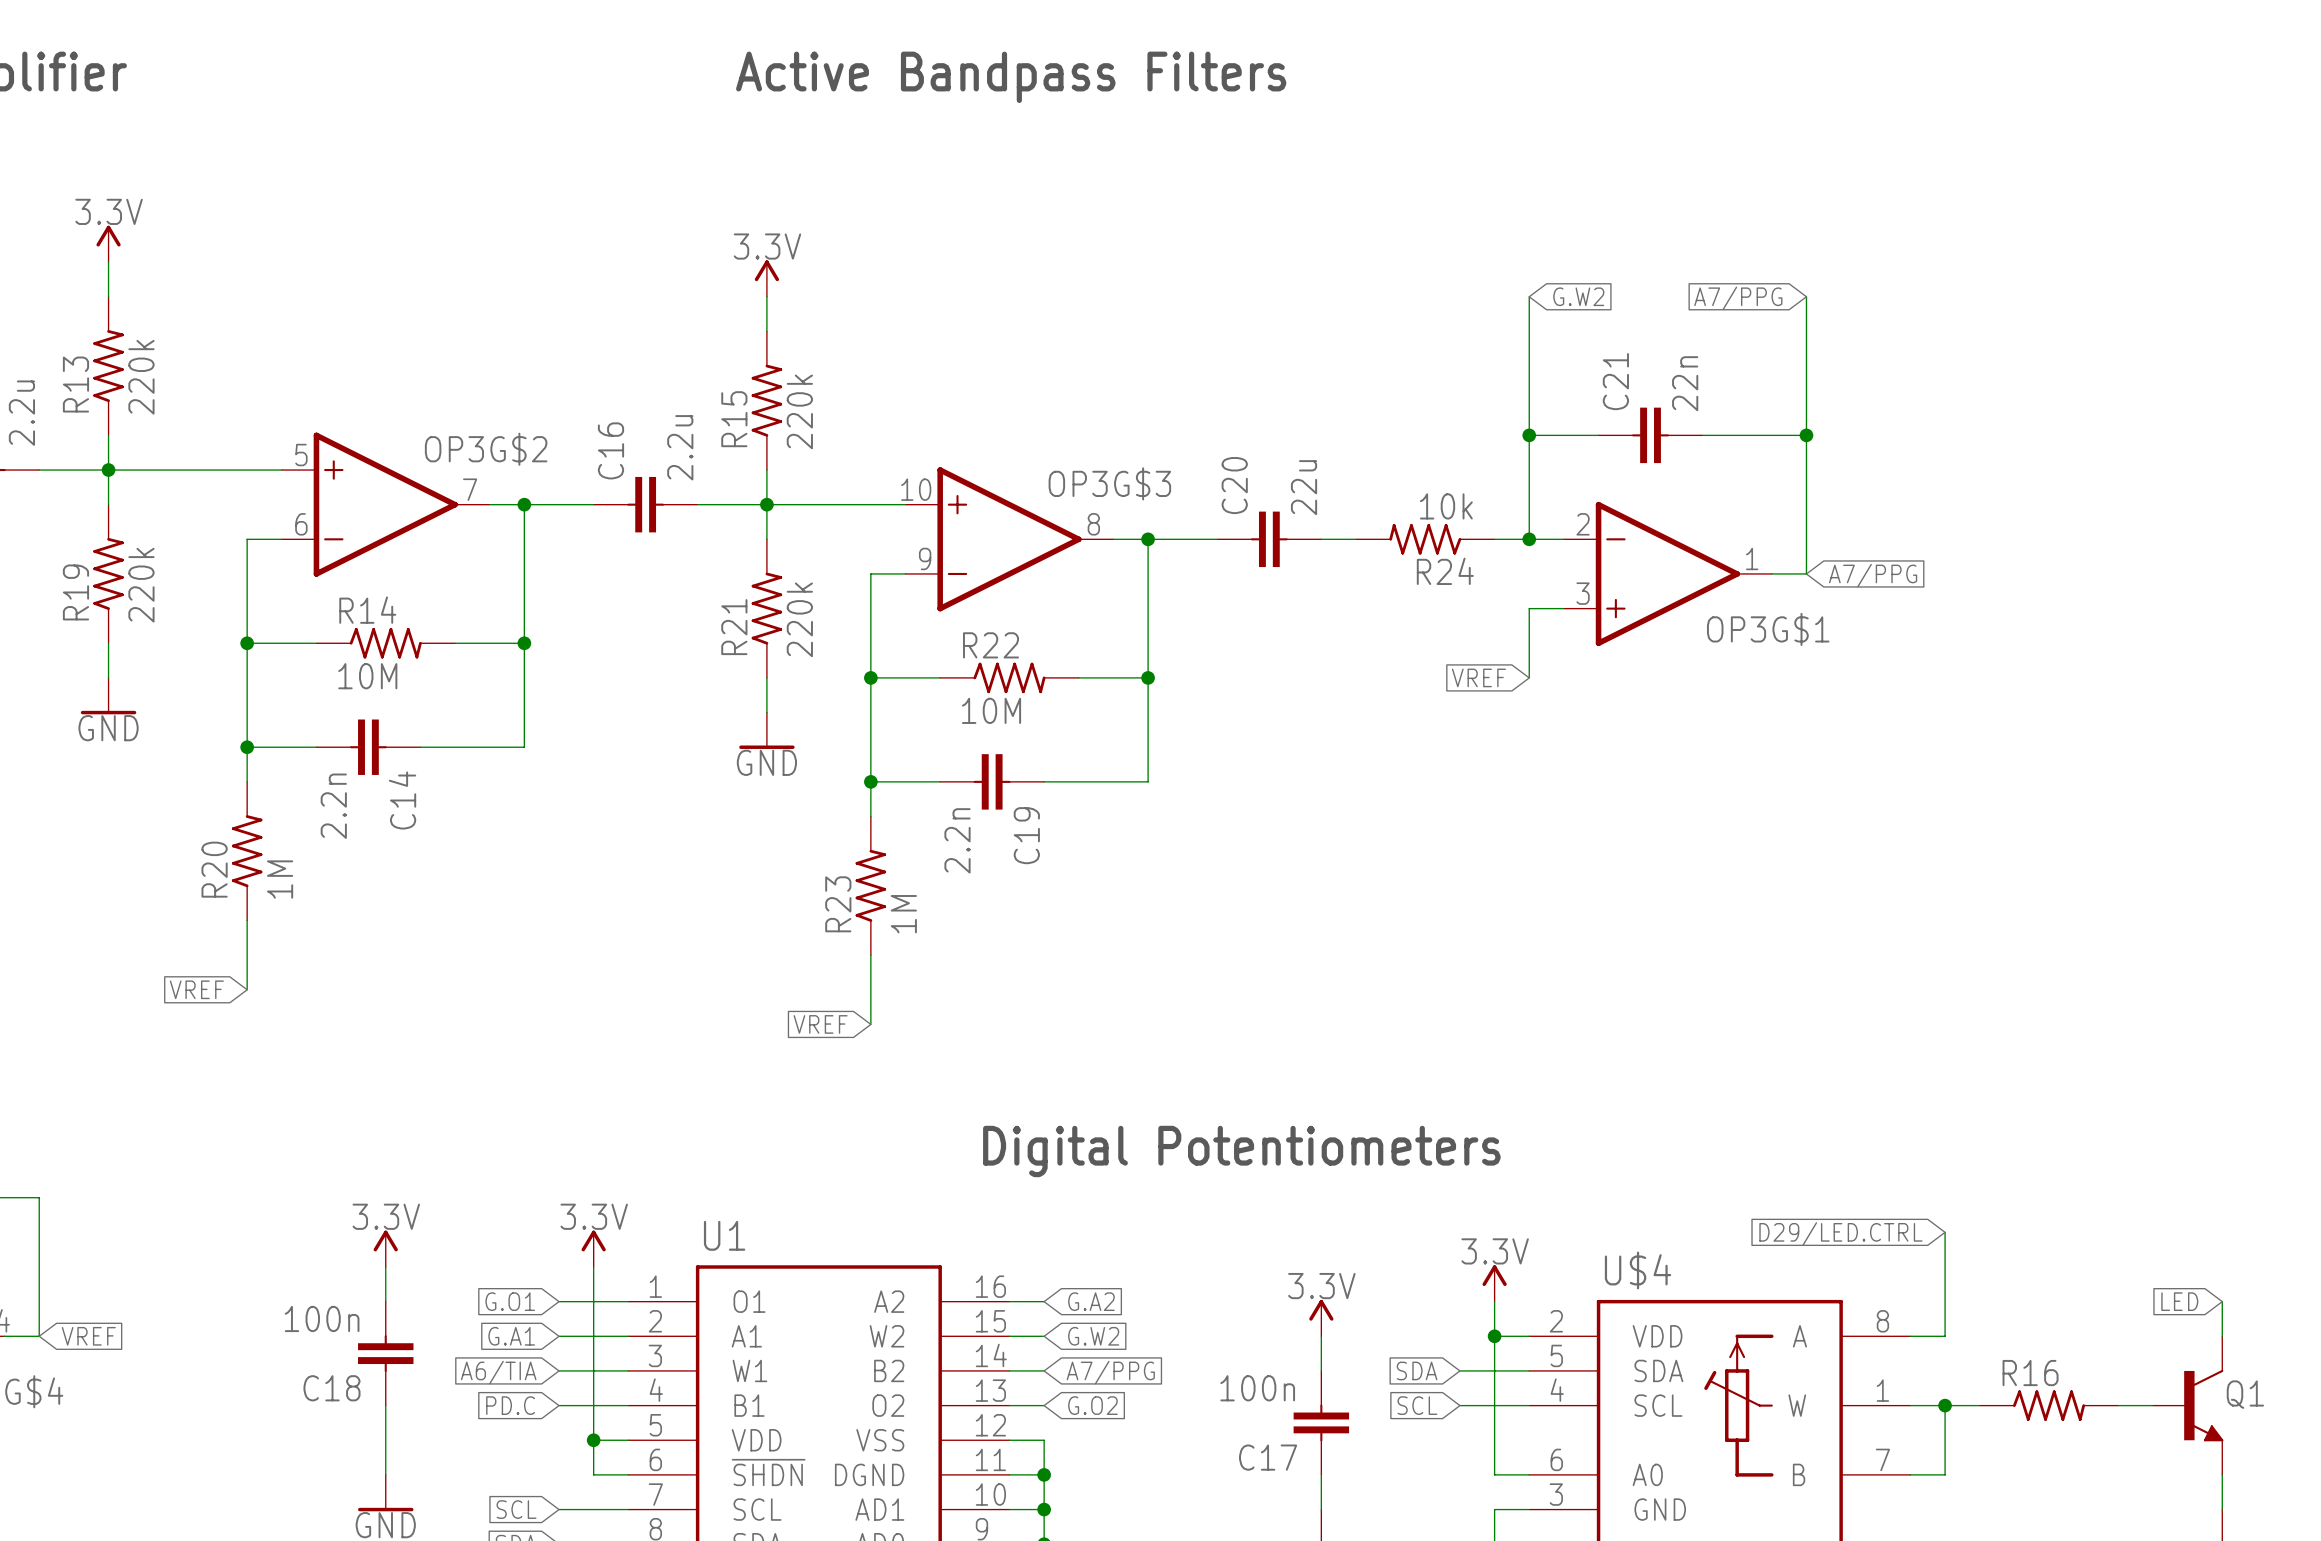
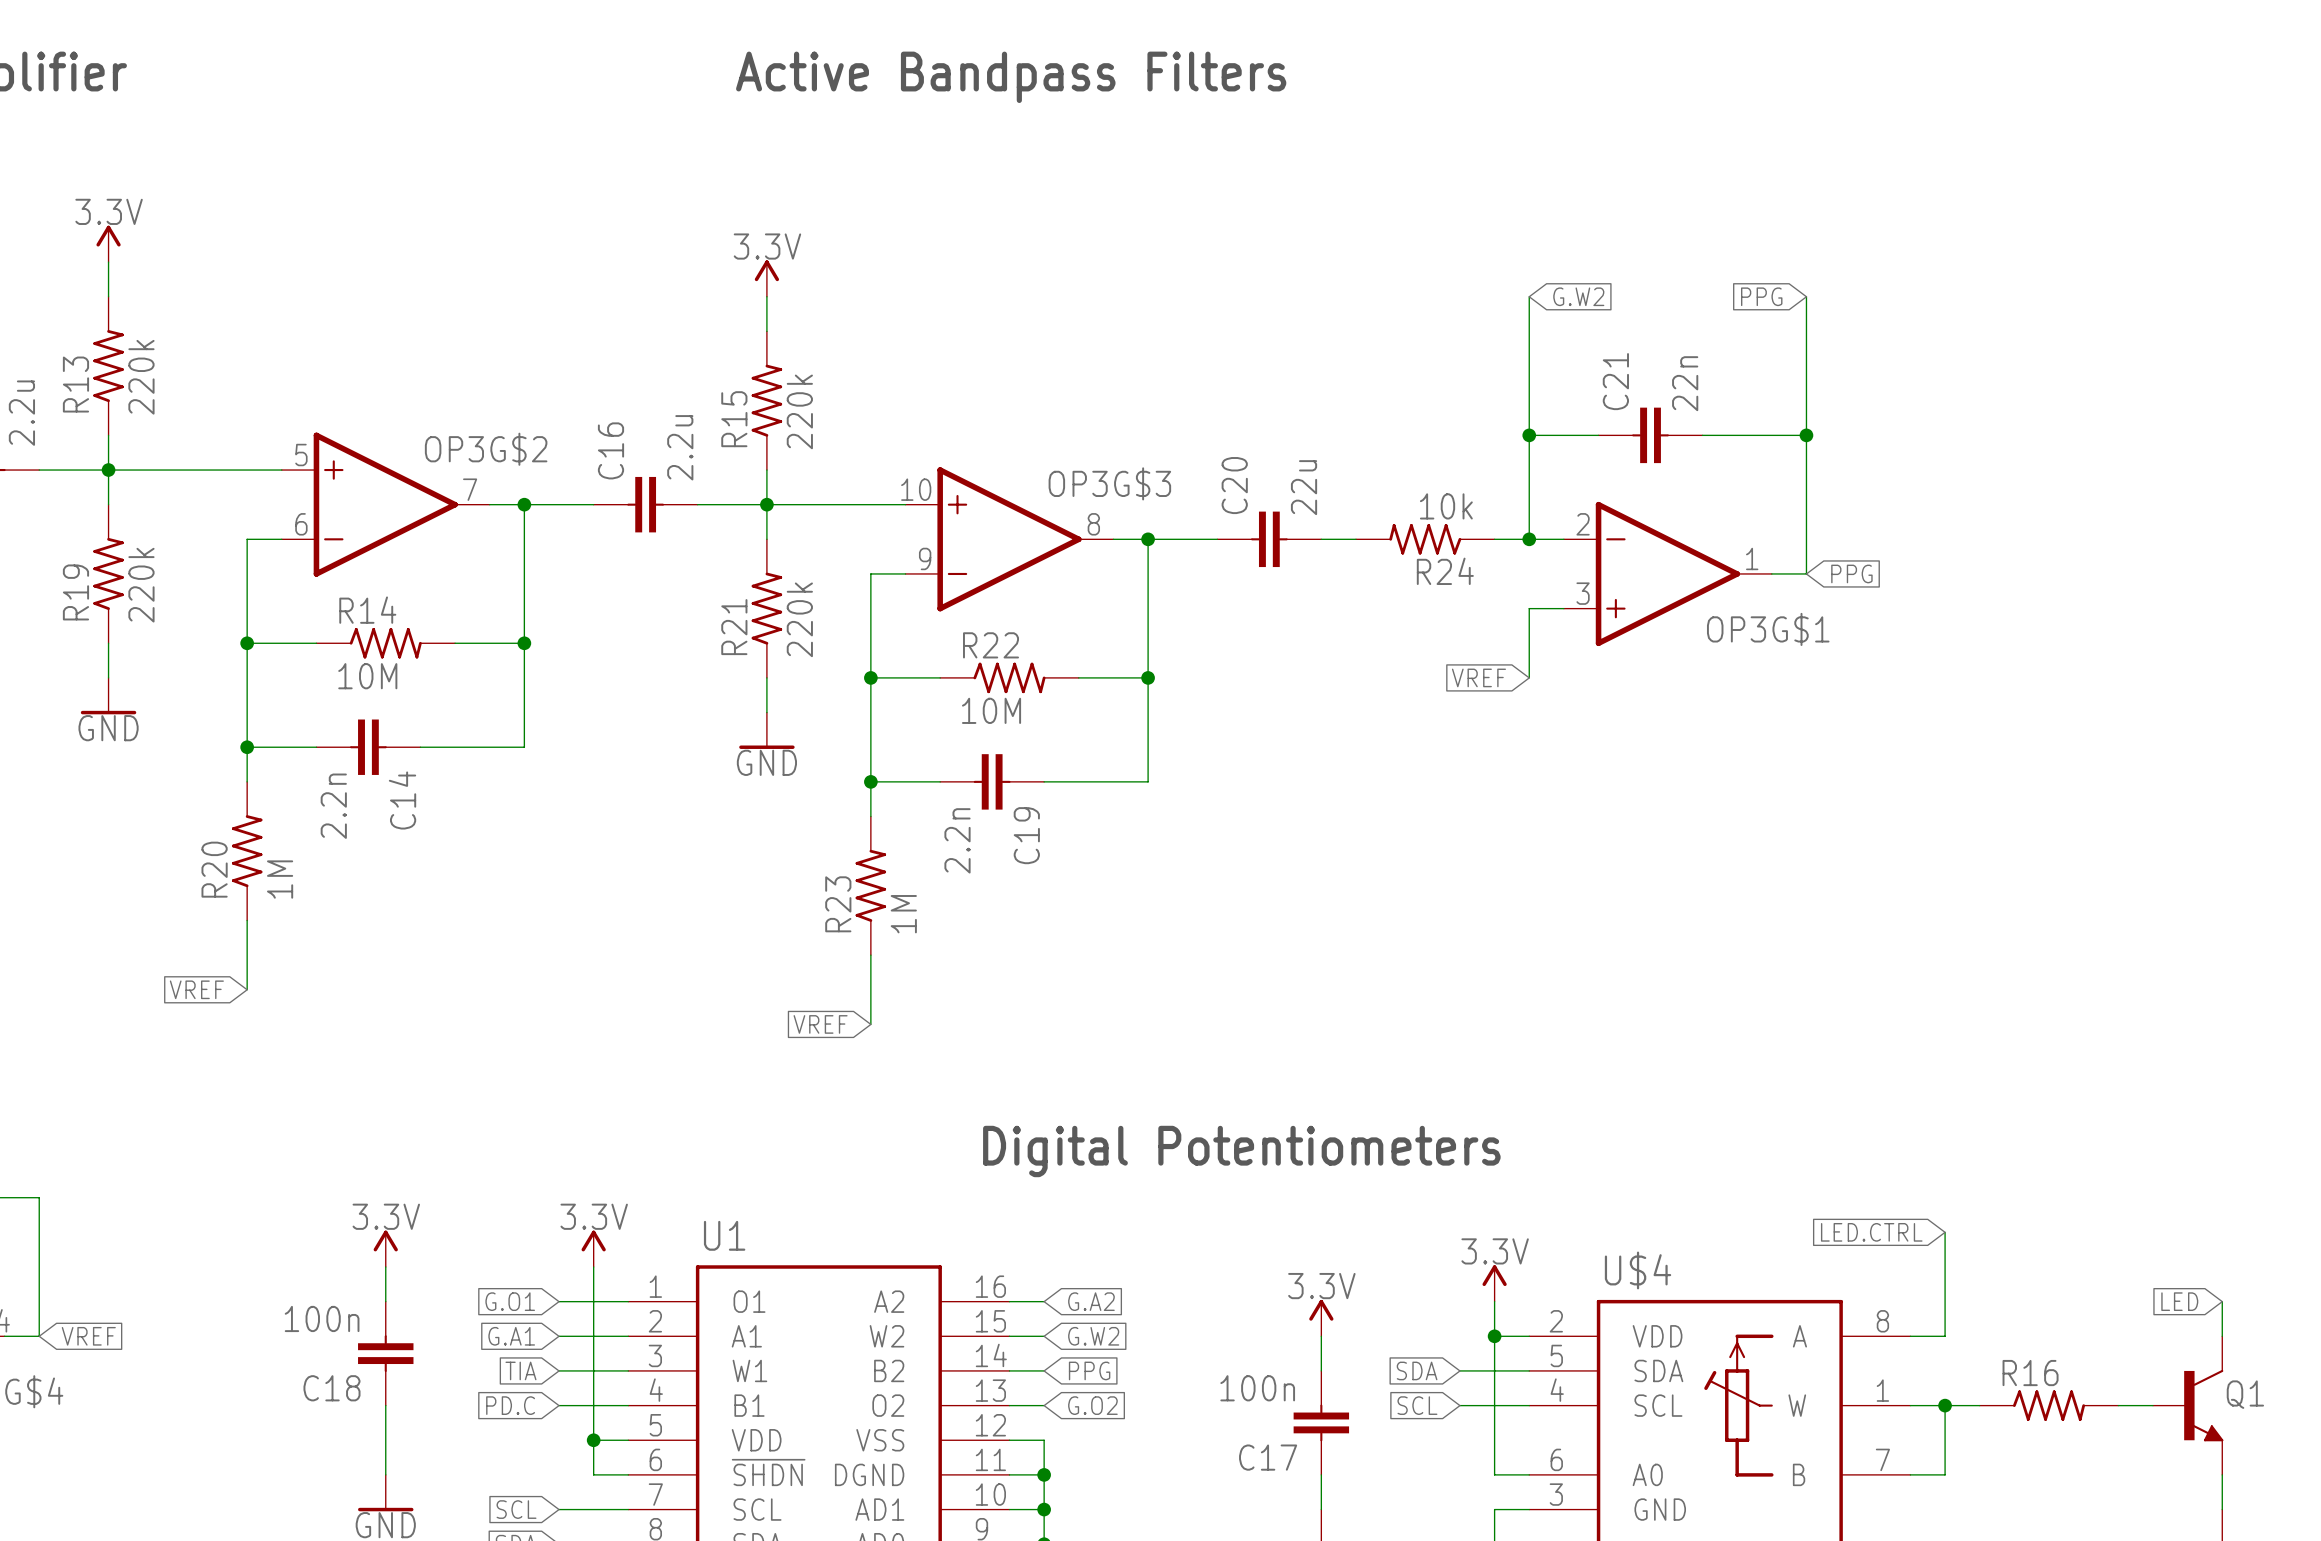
global label: A7/PPG (1738, 298) -> PPG (1761, 296)
global label: A7/PPG (1873, 575) -> PPG (1851, 573)
global label: D29/LED.CTRL (1840, 1234) -> LED.CTRL (1871, 1232)
global label: A6/TIA (498, 1372) -> TIA (520, 1370)
global label: A7/PPG (1110, 1372) -> PPG (1089, 1370)

